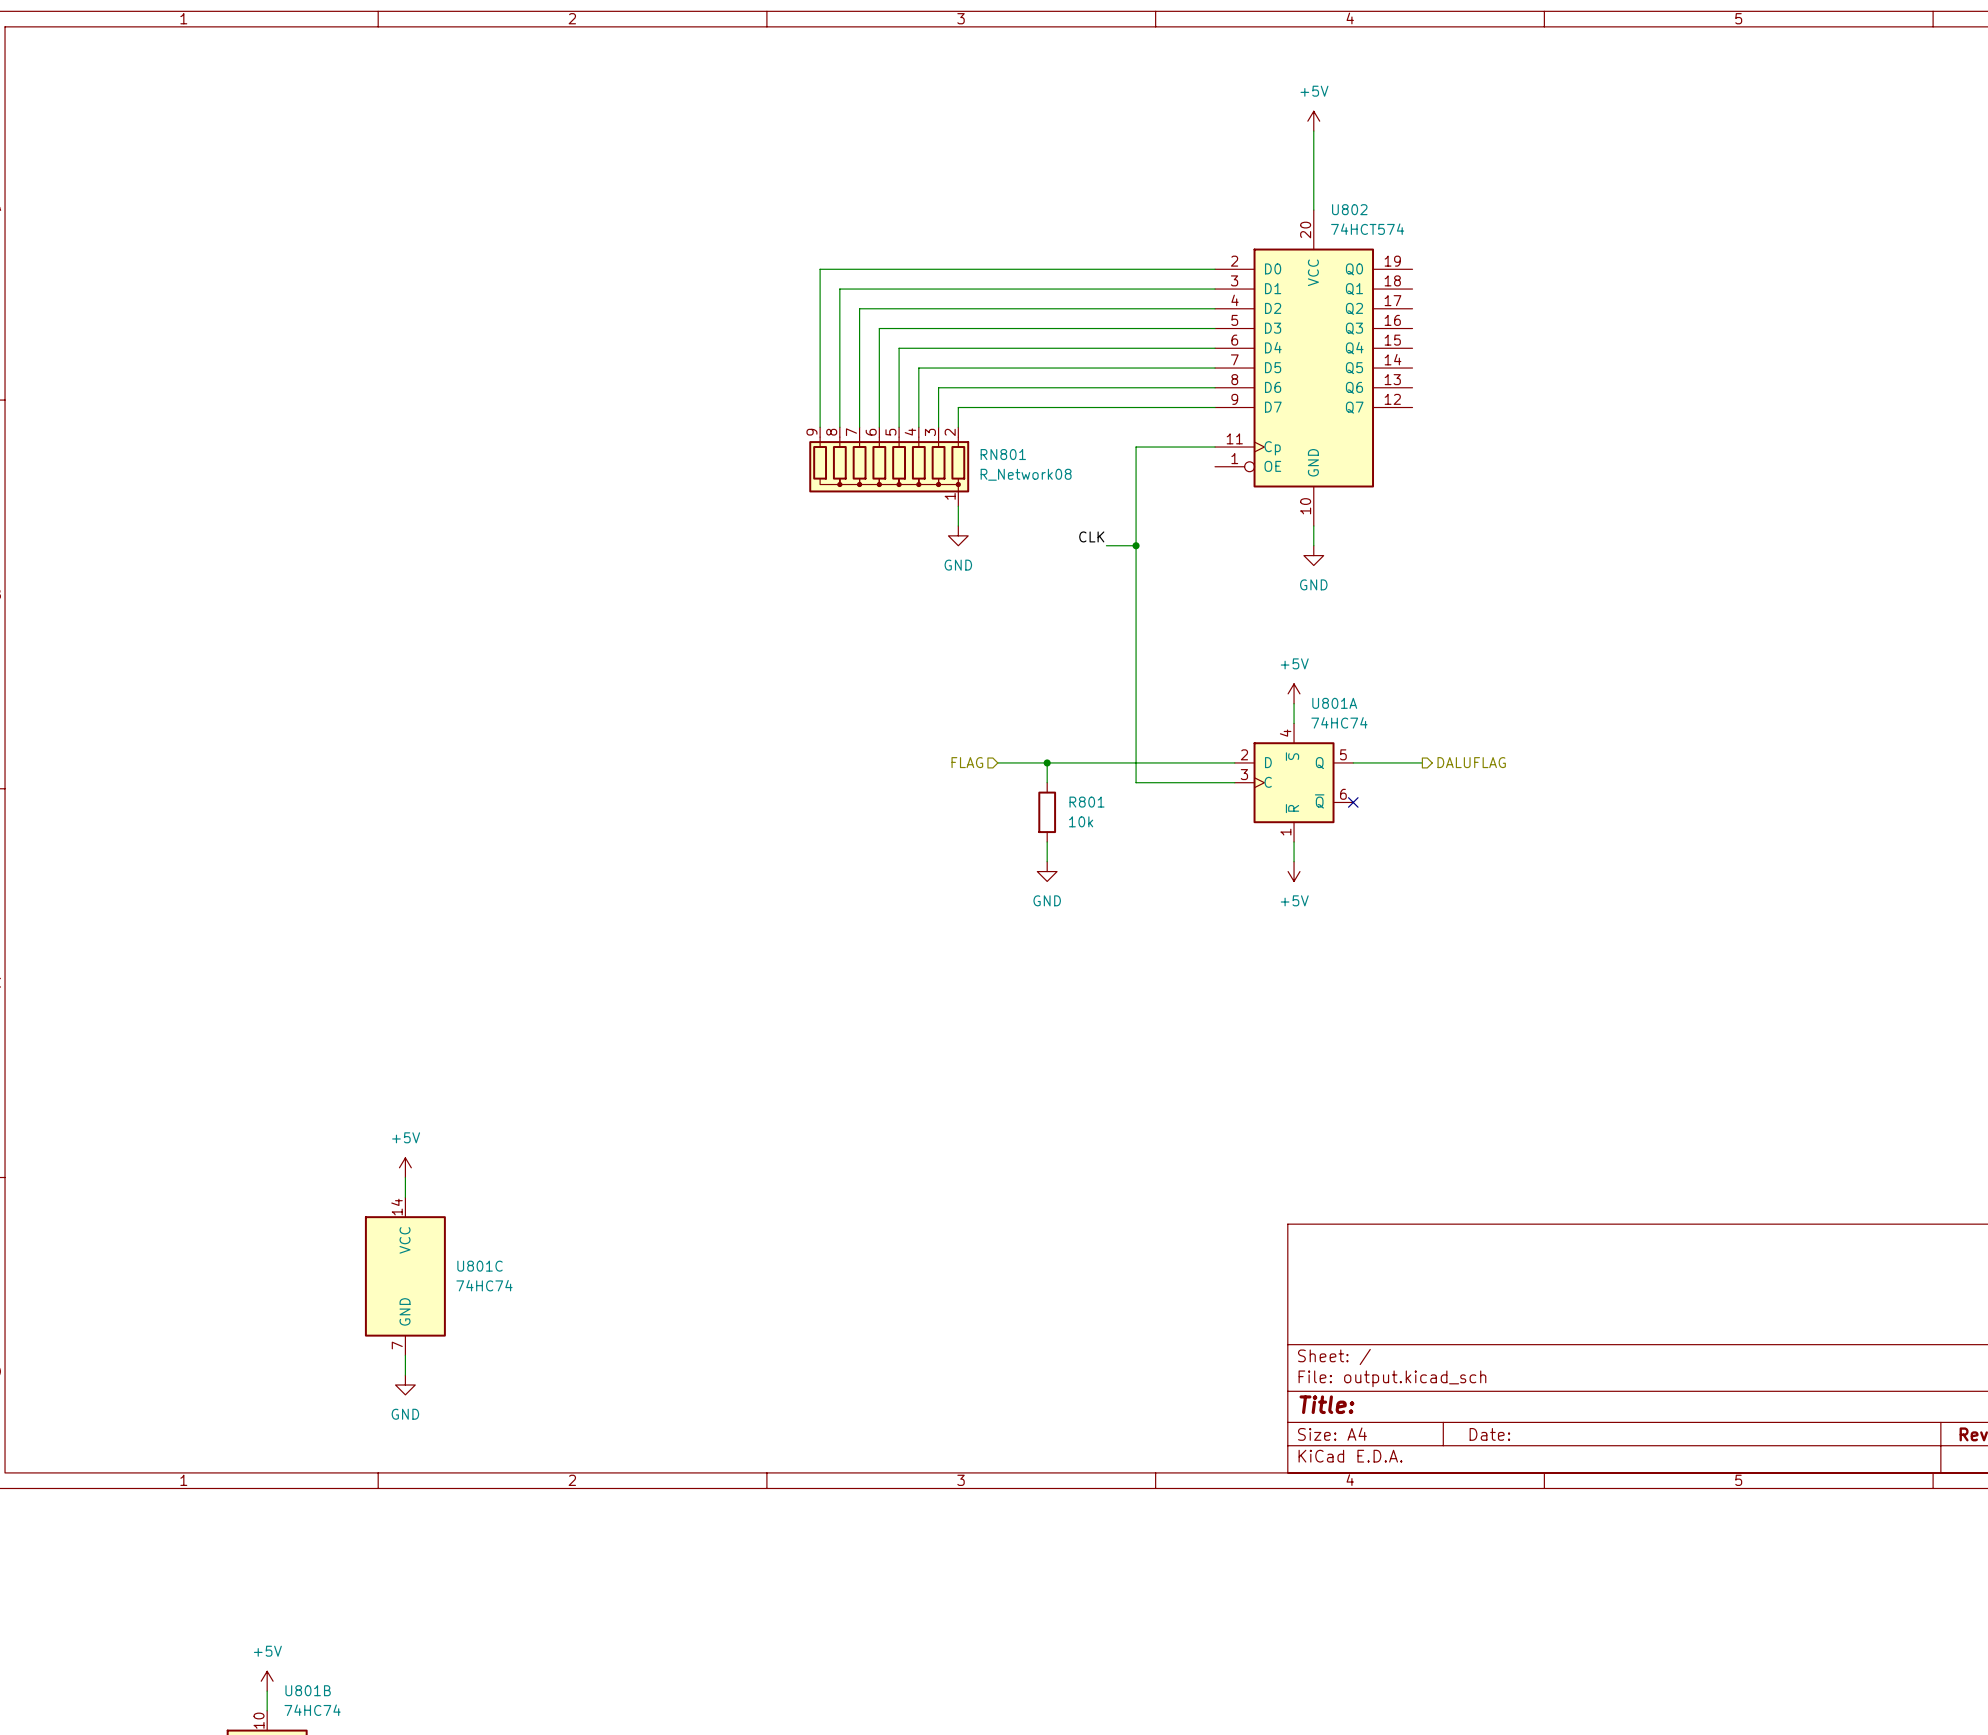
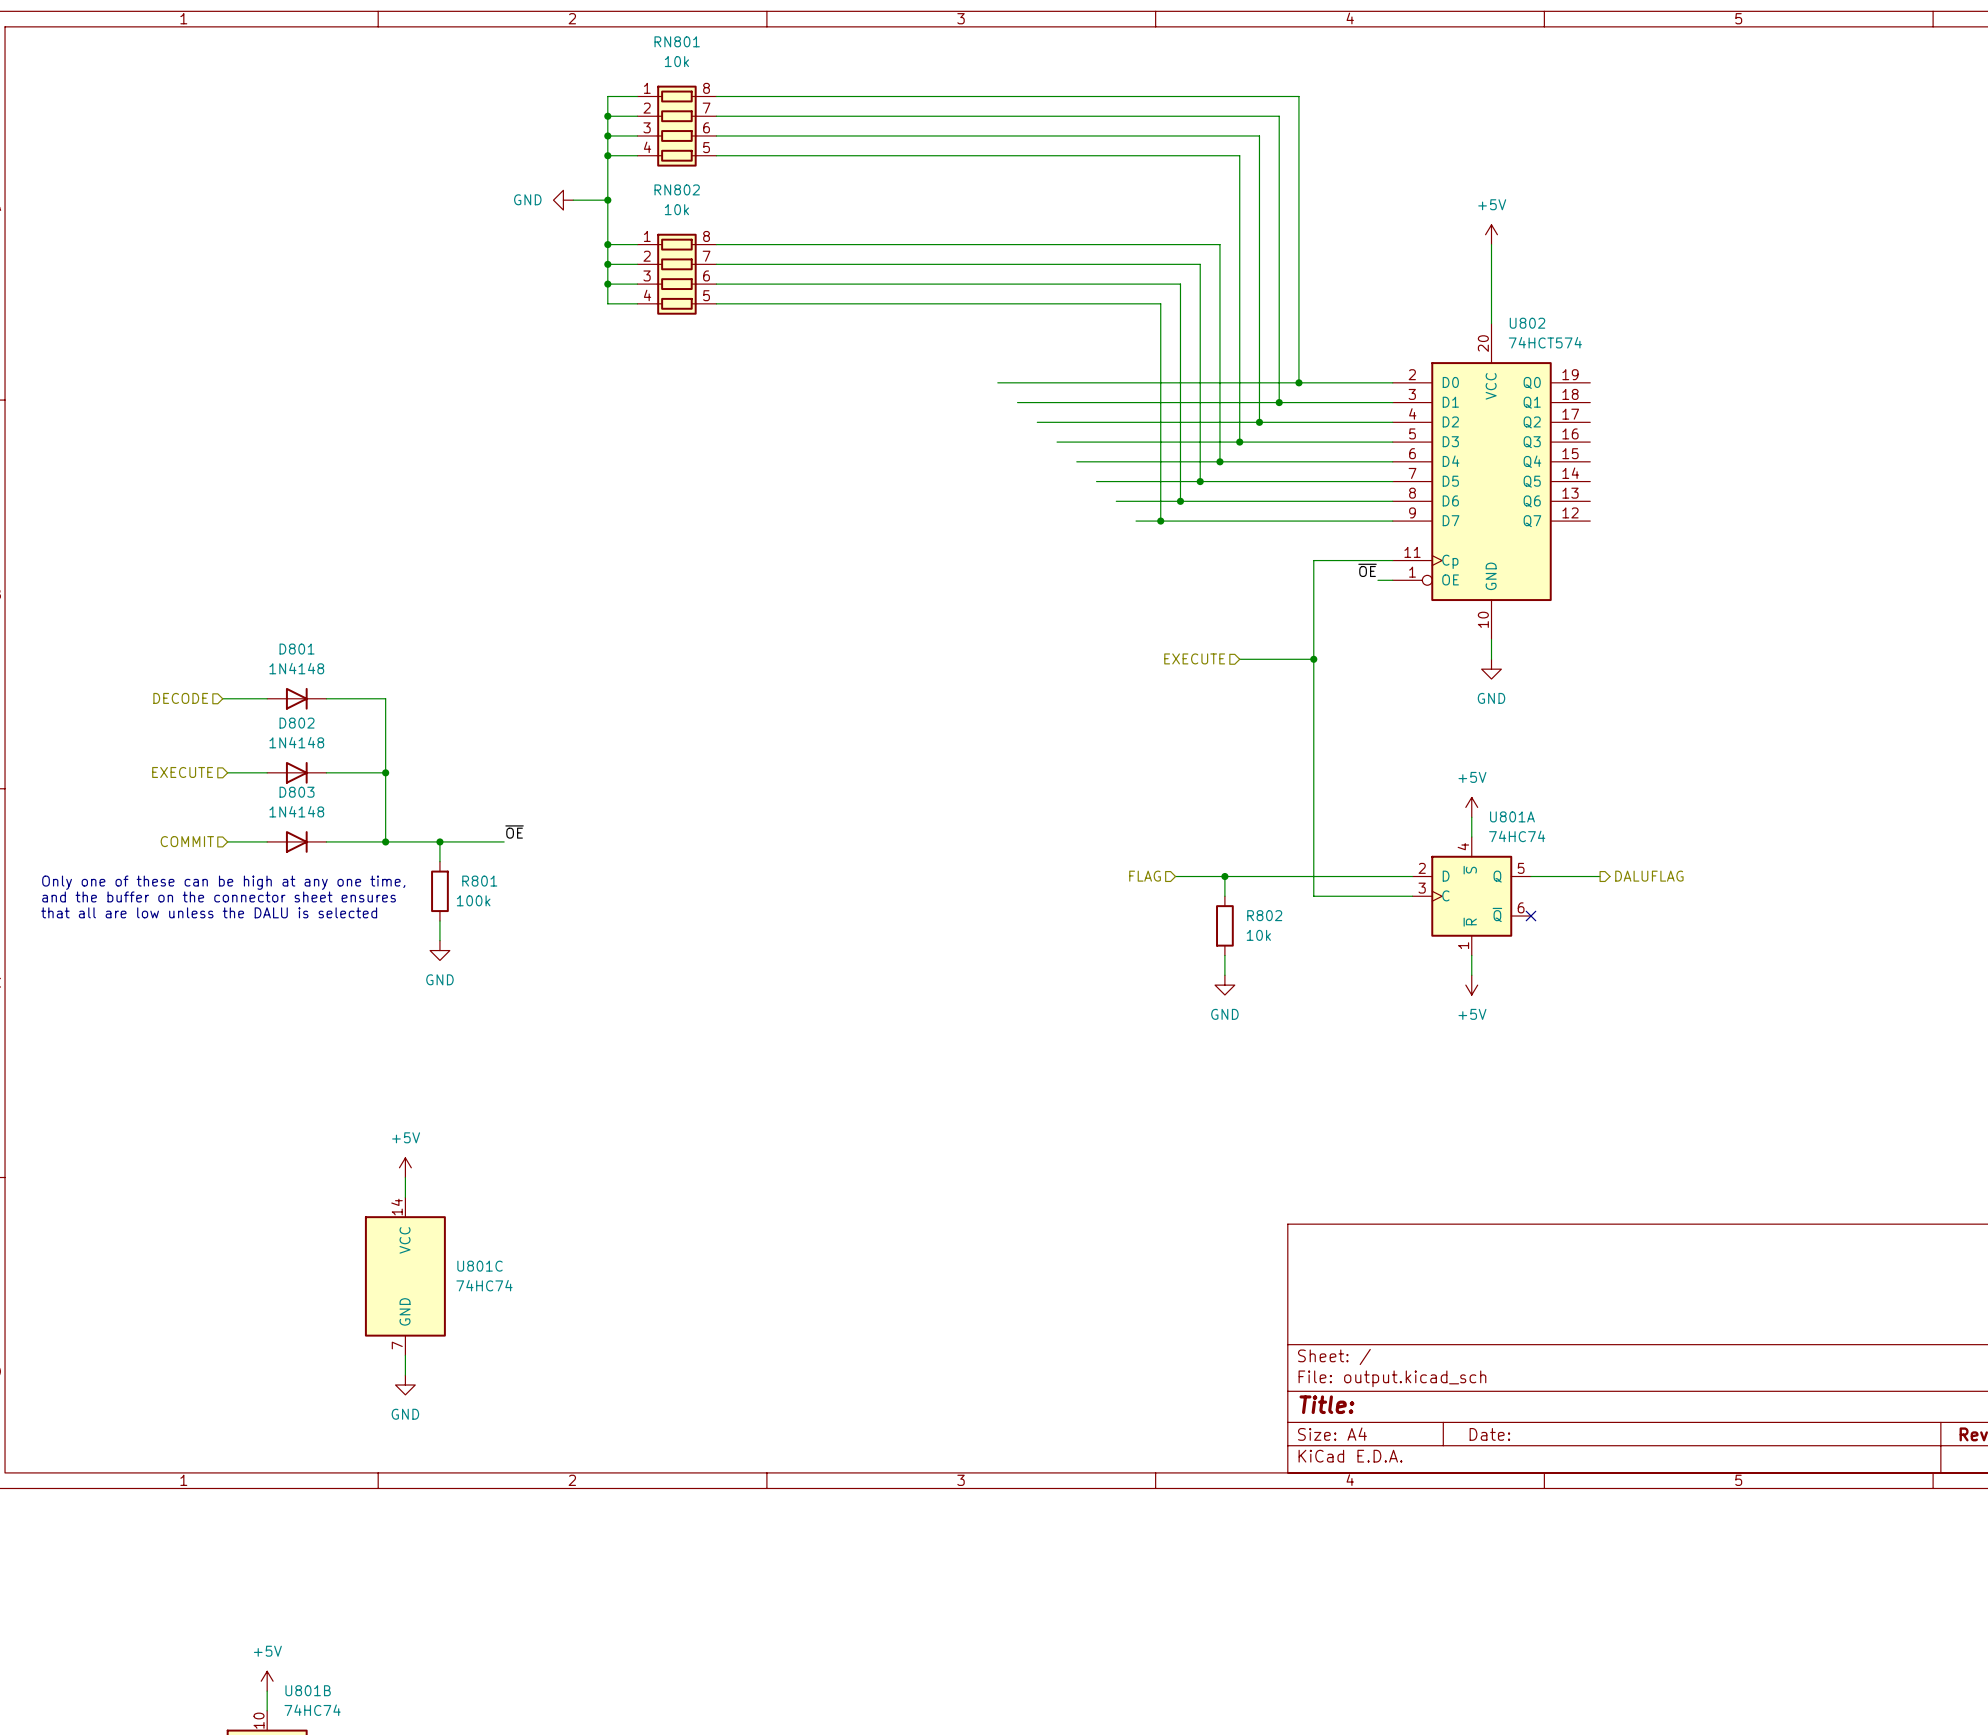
wire: none -> (637, 96) (607, 96) (607, 303) (637, 303)
wire: none -> (716, 96) (1298, 96) (1298, 382)
wire: none -> (607, 116) (637, 116)
junction: none -> (607, 116)
wire: none -> (716, 116) (1279, 116) (1279, 402)
power symbol: +5V (1313, 121) -> none
wire: (1313, 131) (1313, 210) -> none
wire: none -> (607, 135) (637, 135)
junction: none -> (607, 135)
wire: none -> (716, 135) (1259, 135) (1259, 422)
wire: none -> (607, 155) (637, 155)
junction: none -> (607, 155)
wire: none -> (716, 155) (1239, 155) (1239, 442)
power symbol: none -> GND (563, 200)
wire: none -> (573, 200) (607, 200)
junction: none -> (607, 200)
power symbol: none -> +5V (1491, 234)
wire: none -> (607, 244) (637, 244)
junction: none -> (607, 244)
wire: none -> (716, 244) (1219, 244) (1219, 461)
wire: none -> (1491, 244) (1491, 323)
wire: none -> (607, 264) (637, 264)
junction: none -> (607, 264)
wire: none -> (716, 264) (1200, 264) (1200, 481)
wire: (1215, 269) (820, 269) (820, 427) -> none
RN802: none -> 10k (676, 274)
wire: none -> (607, 284) (637, 284)
junction: none -> (607, 284)
wire: none -> (716, 284) (1180, 284) (1180, 501)
wire: (1215, 289) (839, 289) (839, 427) -> none
wire: none -> (716, 303) (1160, 303) (1160, 521)
wire: (1215, 308) (859, 308) (859, 427) -> none
wire: (1215, 328) (879, 328) (879, 427) -> none
wire: (1215, 348) (899, 348) (899, 427) -> none
wire: (1215, 368) (918, 368) (918, 427) -> none
U802 position: (1313, 368) -> (1491, 481)
wire: none -> (997, 382) (1392, 382)
junction: none -> (1298, 382)
wire: (1215, 387) (938, 387) (938, 427) -> none
wire: none -> (1017, 402) (1392, 402)
junction: none -> (1279, 402)
wire: (1215, 407) (958, 407) (958, 427) -> none
wire: none -> (1037, 422) (1392, 422)
junction: none -> (1259, 422)
RN801 symbol: [809, 427, 970, 507] -> [637, 85, 717, 167]
wire: none -> (1057, 442) (1392, 442)
junction: none -> (1239, 442)
wire: (1215, 447) (1136, 447) (1136, 782) (1234, 782) -> none
RN801 name position: RN801 (1003, 454) -> RN801 (677, 41)
wire: none -> (1076, 461) (1392, 461)
junction: none -> (1219, 461)
RN801 value: R_Network08 (1026, 474) -> 10k (676, 61)
wire: none -> (1096, 481) (1392, 481)
junction: none -> (1200, 481)
wire: none -> (1116, 501) (1392, 501)
junction: none -> (1180, 501)
wire: (958, 506) (958, 526) -> none
wire: none -> (1136, 521) (1392, 521)
junction: none -> (1160, 521)
wire: (1313, 526) (1313, 545) -> none
power symbol: GND (958, 535) -> none
label: CLK (1091, 536) -> none
wire: (1106, 545) (1136, 545) -> none
junction: (1136, 545) -> none
power symbol: GND (1313, 555) -> none
wire: none -> (1392, 560) (1313, 560) (1313, 896) (1412, 896)
label: none -> ~{OE} (1367, 570)
wire: none -> (1377, 580) (1392, 580)
wire: none -> (1491, 639) (1491, 659)
hierarchical label: none -> EXECUTE (1194, 658)
wire: none -> (1239, 659) (1313, 659)
junction: none -> (1313, 659)
power symbol: none -> GND (1491, 669)
power symbol: +5V (1294, 693) -> none
hierarchical label: none -> DECODE (180, 698)
wire: none -> (222, 698) (267, 698)
D801: none -> 1N4148 (296, 698)
wire: none -> (326, 698) (385, 698) (385, 841)
wire: (1294, 703) (1294, 723) -> none
hierarchical label: FLAG (967, 762) -> none
wire: (997, 762) (1234, 762) -> none
wire: (1047, 762) (1047, 782) -> none
junction: (1047, 762) -> none
wire: (1353, 762) (1422, 762) -> none
hierarchical label: DALUFLAG (1471, 762) -> none
hierarchical label: none -> EXECUTE (182, 772)
wire: none -> (227, 772) (267, 772)
D802: none -> 1N4148 (296, 772)
wire: none -> (326, 772) (385, 772)
junction: none -> (385, 772)
U801A position: (1294, 782) -> (1471, 896)
no-connect mark: (1353, 802) -> none
power symbol: none -> +5V (1471, 807)
R801 position: (1047, 812) -> (439, 891)
wire: none -> (1471, 817) (1471, 837)
R801 value: 10k (1081, 821) -> 100k (473, 900)
label: none -> ~{OE} (514, 832)
hierarchical label: none -> COMMIT (187, 841)
wire: none -> (227, 841) (267, 841)
D803: none -> 1N4148 (296, 841)
wire: none -> (326, 841) (504, 841)
junction: none -> (385, 841)
wire: none -> (439, 841) (439, 861)
junction: none -> (439, 841)
wire: (1047, 841) (1047, 861) -> none
wire: (1294, 841) (1294, 861) -> (1224, 876) (1224, 896)
power symbol: GND (1047, 871) -> none
power symbol: +5V (1294, 871) -> none
hierarchical label: none -> FLAG (1145, 876)
wire: none -> (1175, 876) (1412, 876)
junction: none -> (1224, 876)
wire: none -> (1530, 876) (1600, 876)
hierarchical label: none -> DALUFLAG (1649, 876)
text: none -> Only one of these can be high at any one time, (223, 882)
text: none -> and the buffer on the connector sheet ensures (219, 896)
text: none -> that all are low unless the DALU is selected (209, 912)
no-connect mark: none -> (1530, 916)
wire: none -> (439, 920) (439, 940)
R802: none -> 10k (1224, 925)
power symbol: none -> GND (439, 950)
wire: none -> (1224, 955) (1224, 975)
wire: none -> (1471, 955) (1471, 975)
power symbol: none -> GND (1224, 985)
power symbol: none -> +5V (1471, 985)

